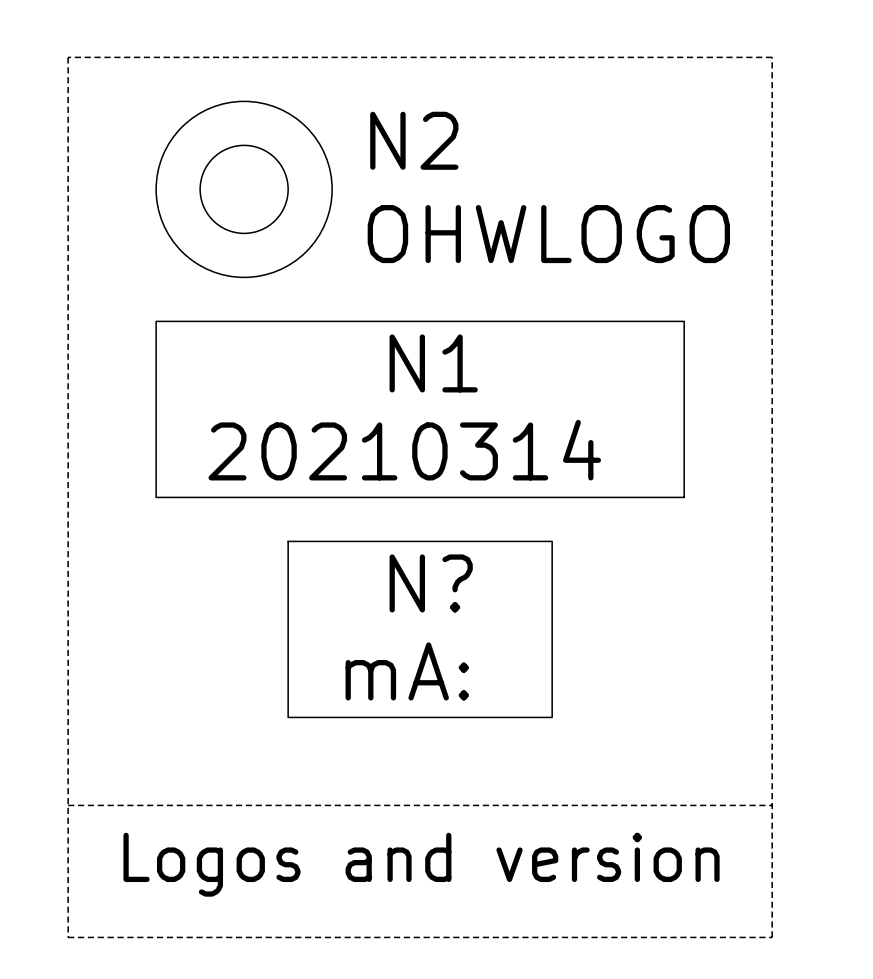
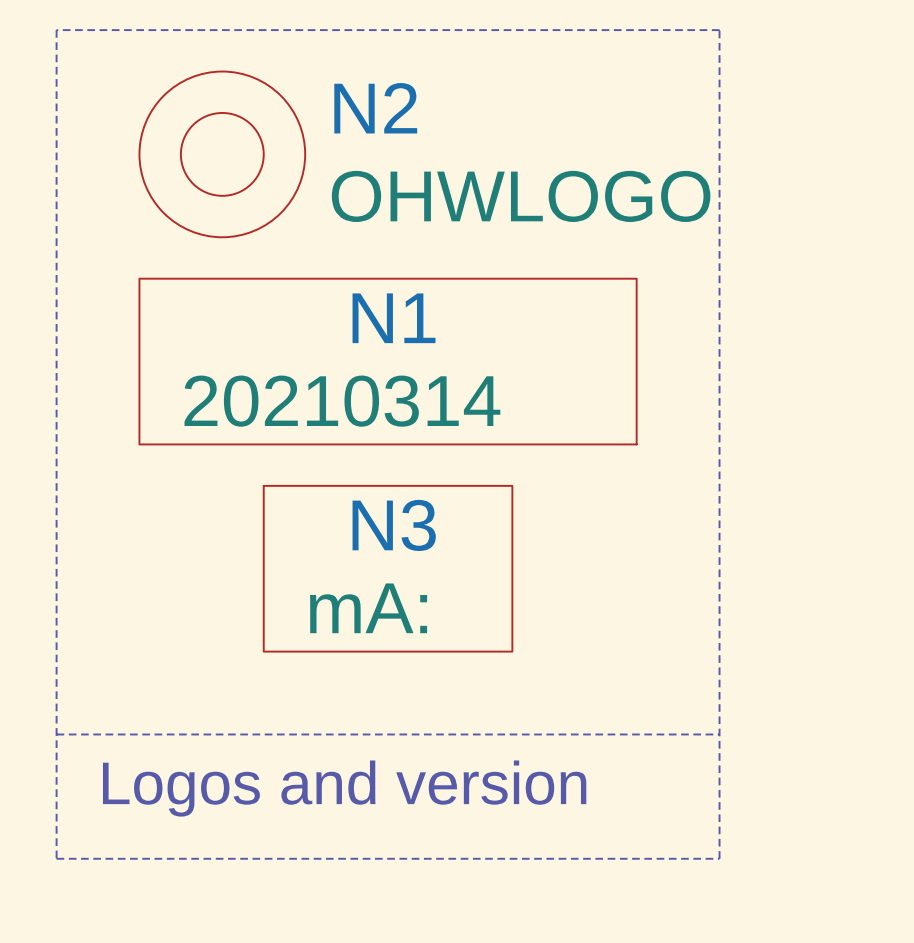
N? name: N? (431, 583) -> N3 (394, 525)

